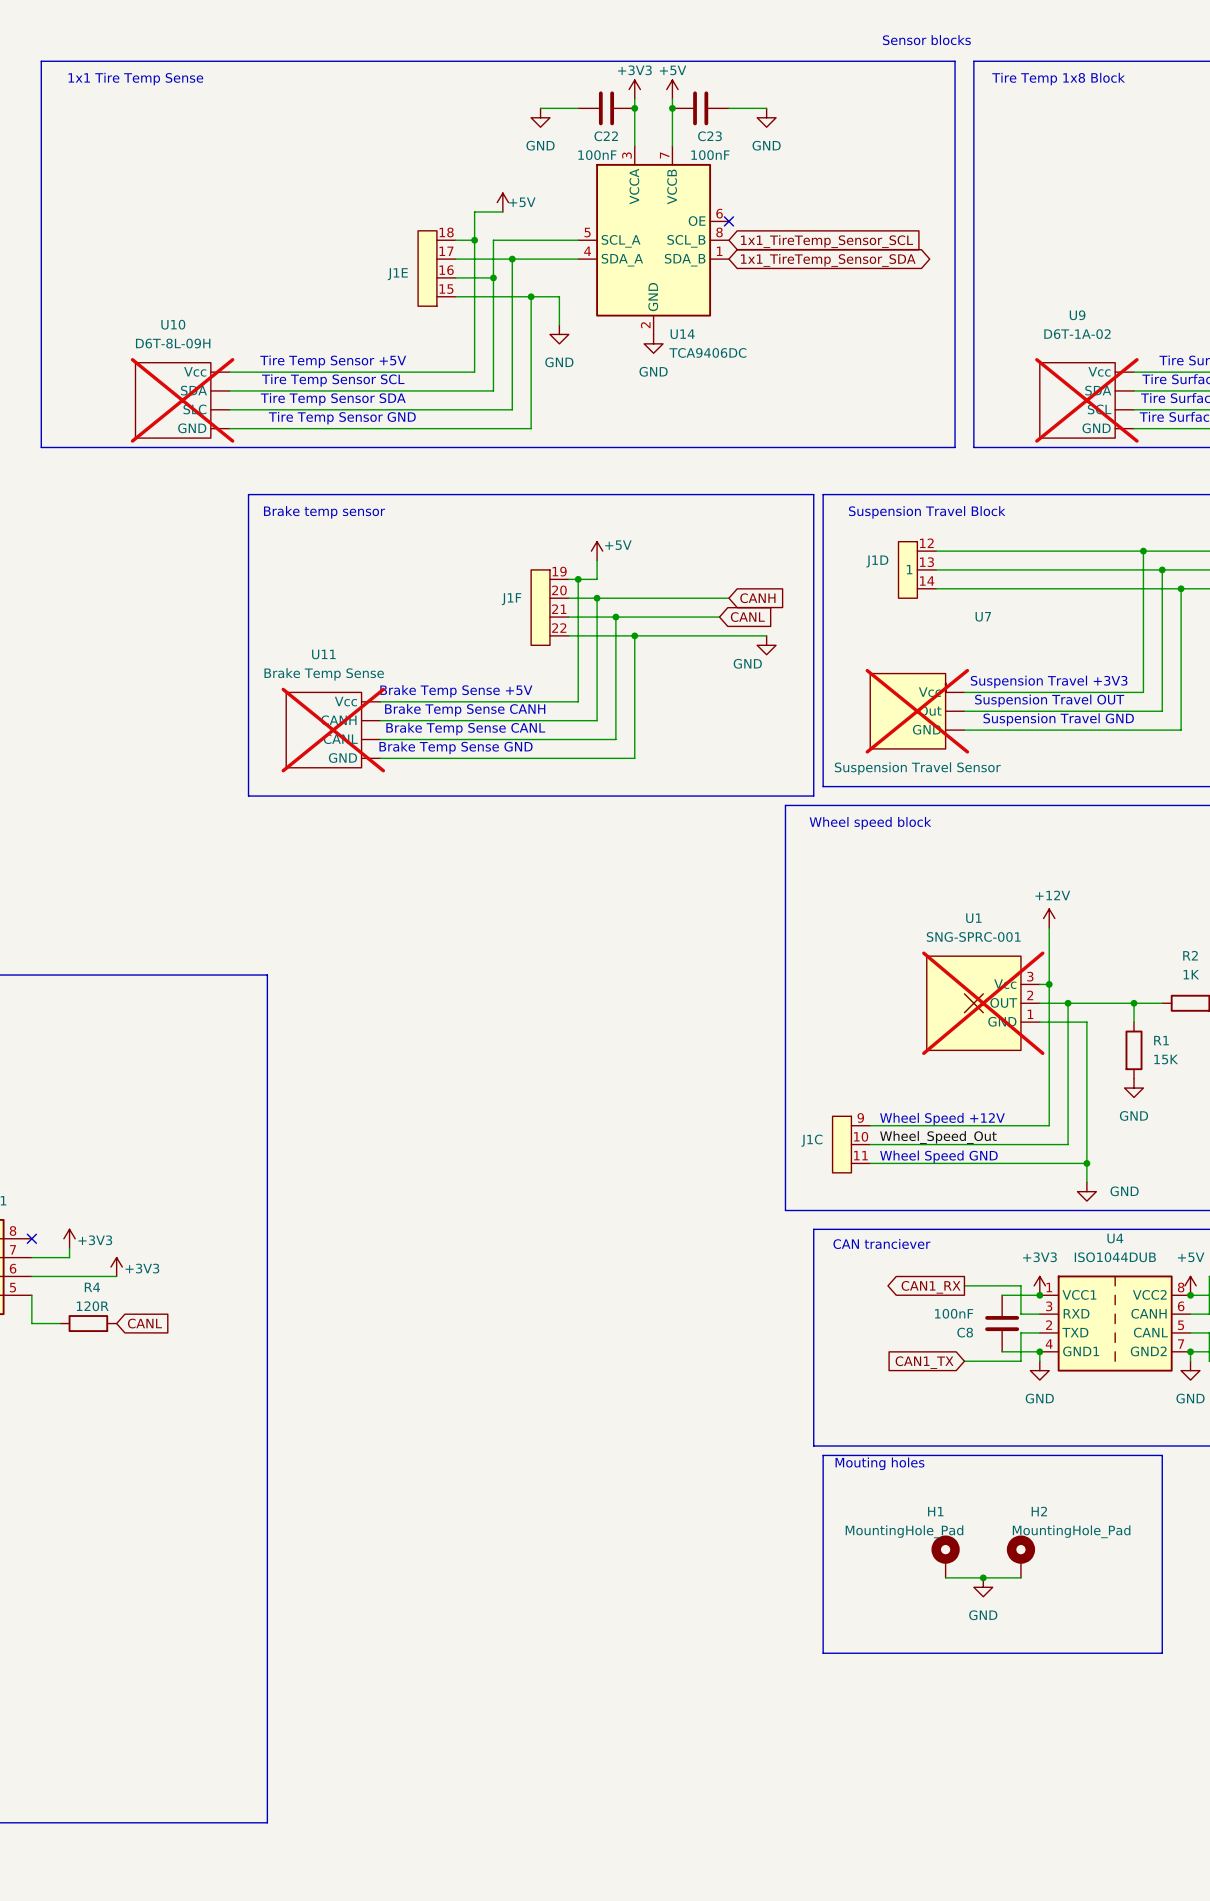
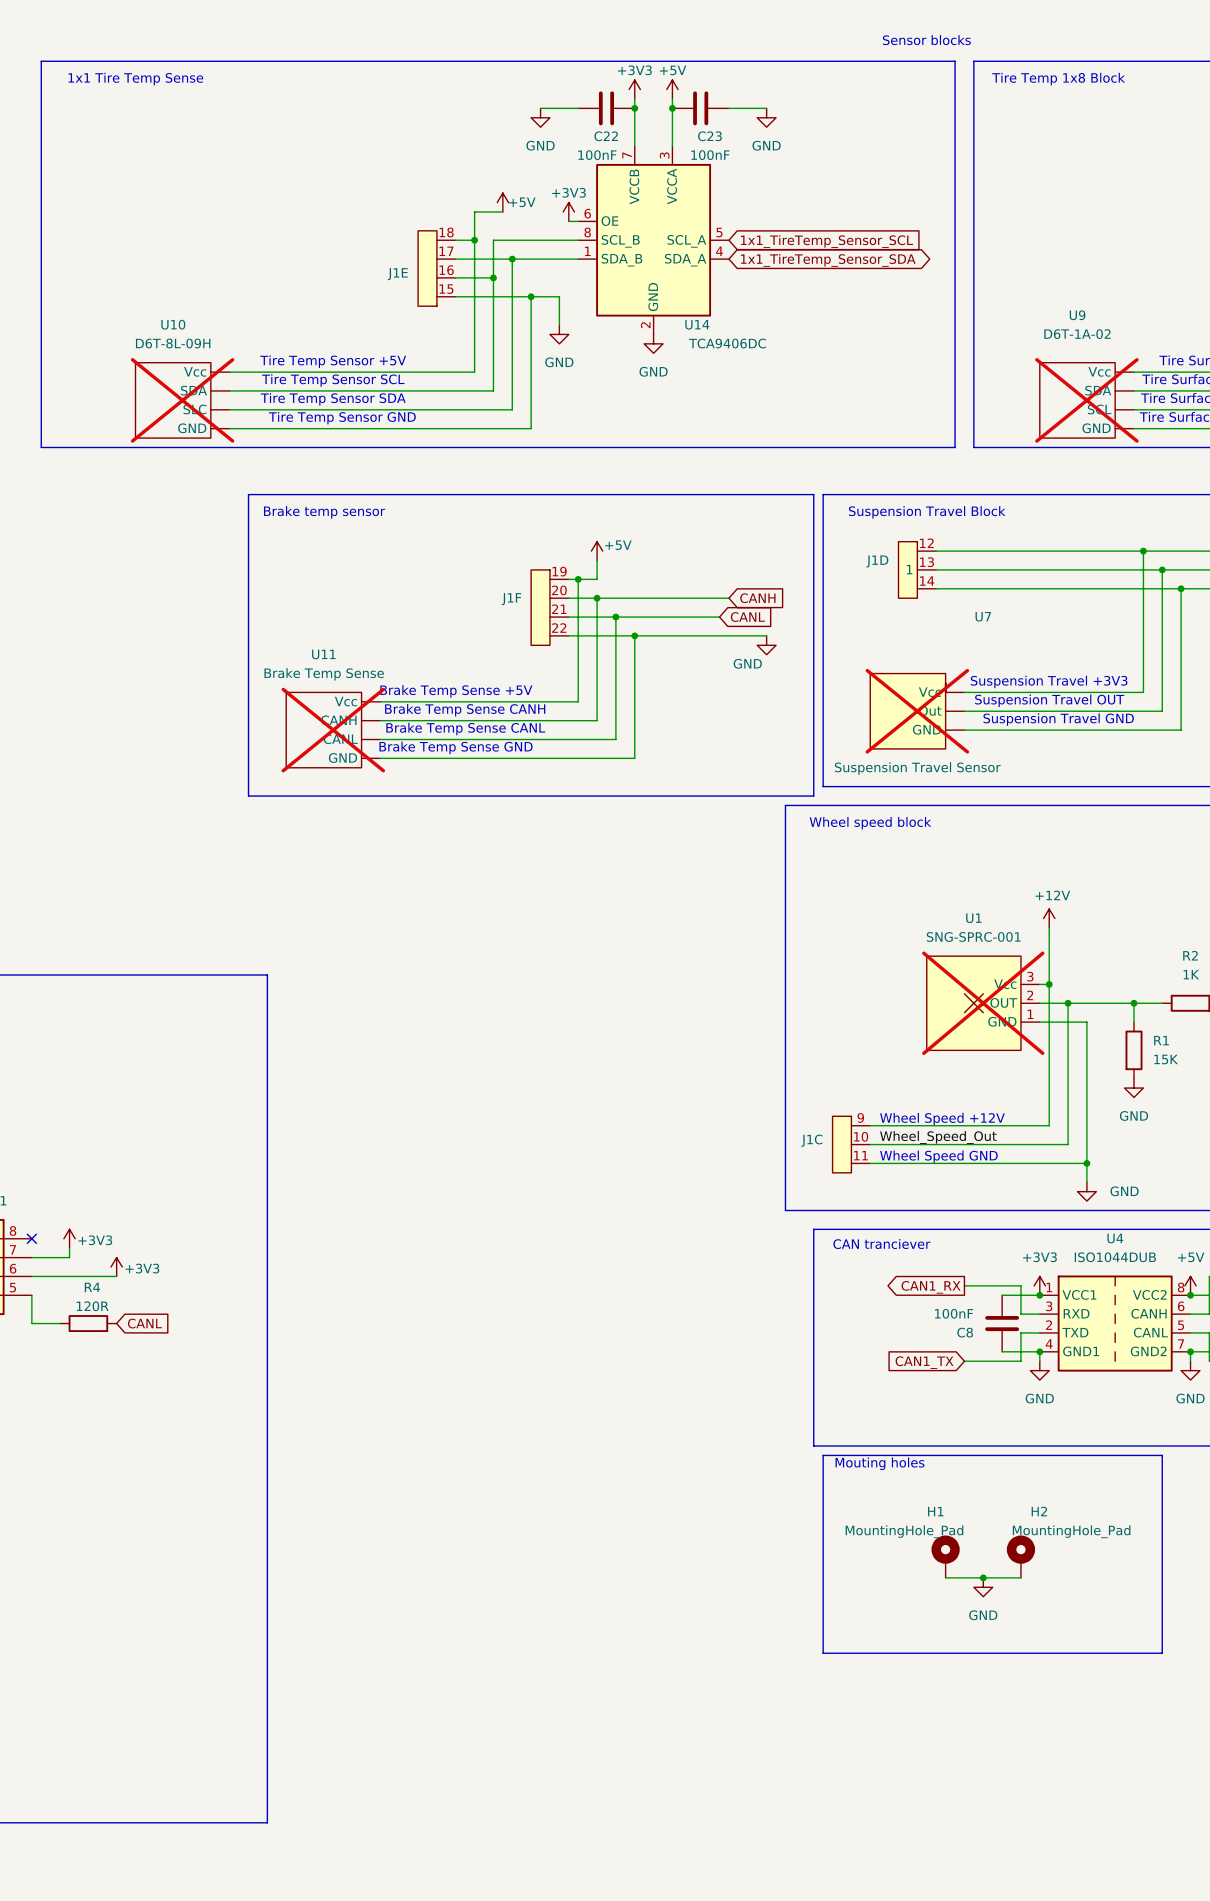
power symbol: none -> +3V3 (568, 211)
wire: none -> (568, 221) (578, 221)
no-connect mark: (728, 221) -> none
U14 flip: as is (653, 240) -> left-right (653, 240)

